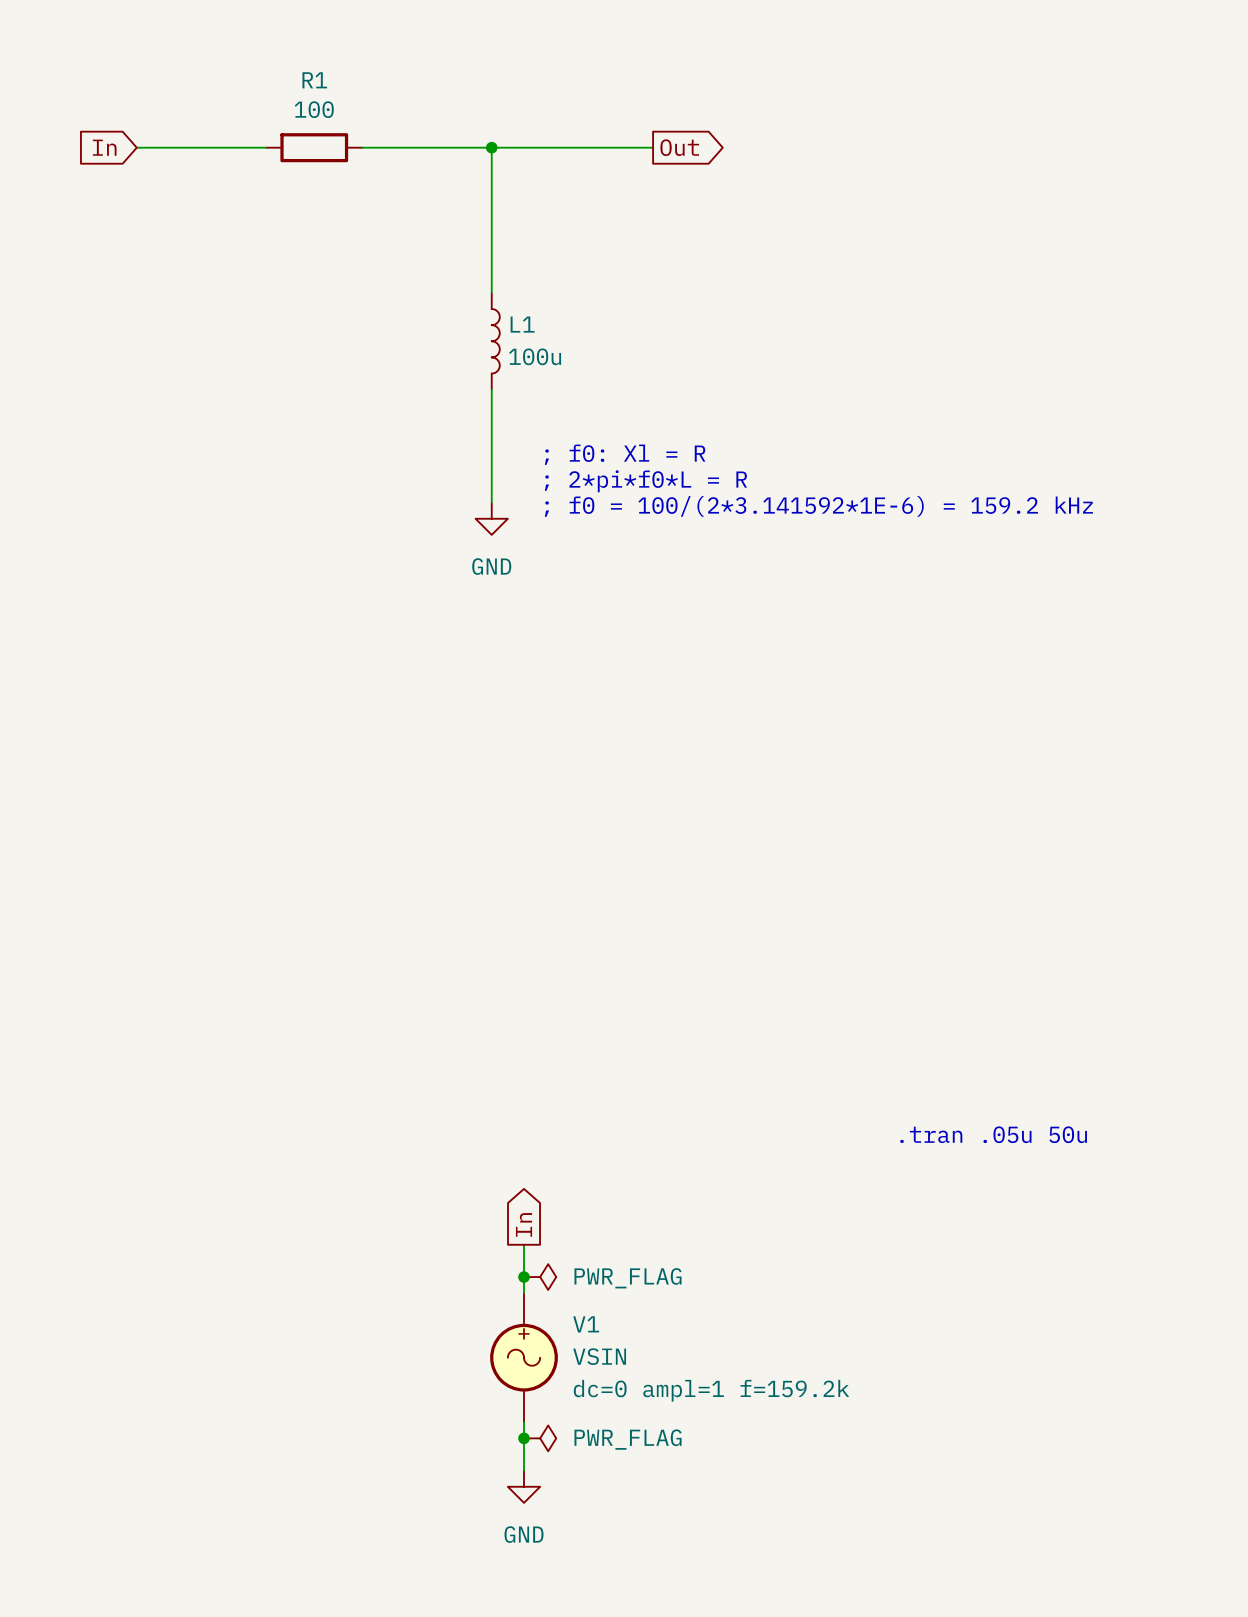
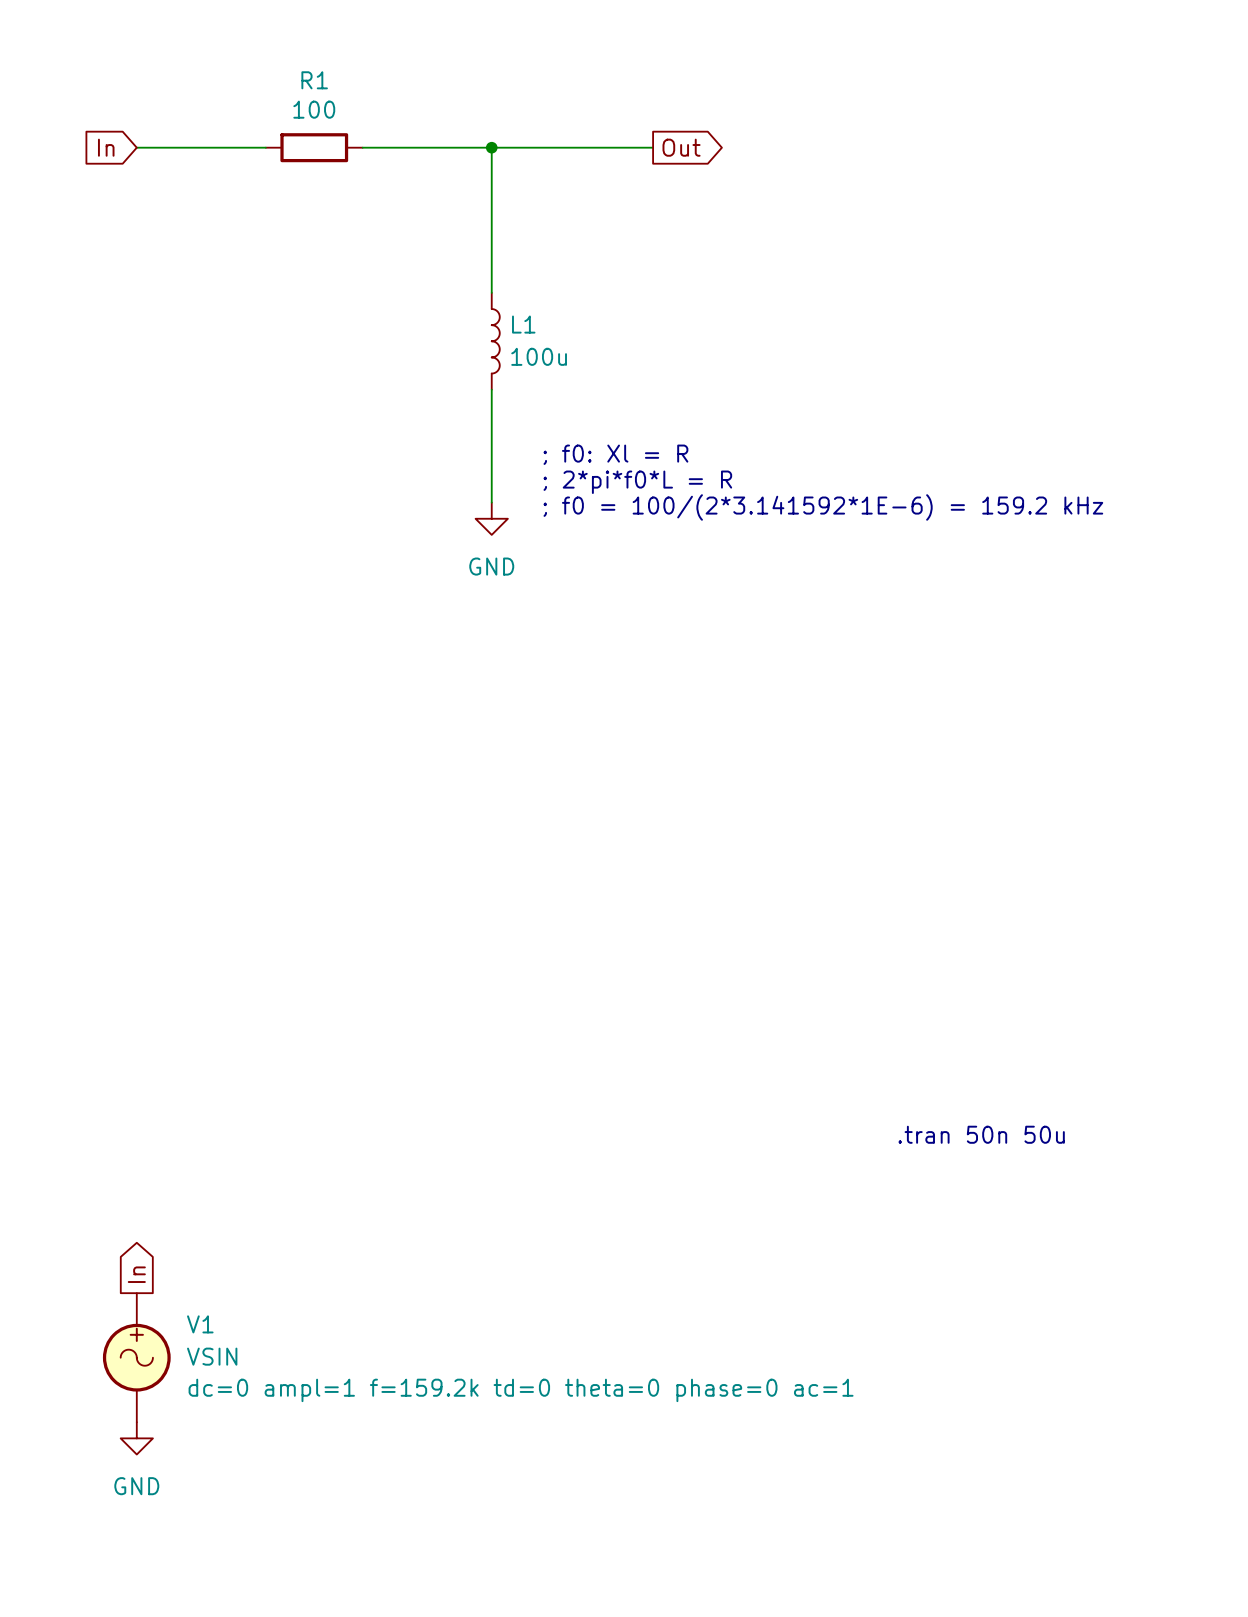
text: .tran .05u 50u (993, 1134) -> .tran 50n 50u (981, 1134)
global label: In (524, 1224) -> none
wire: (524, 1244) (524, 1293) -> none
global label: none -> In (136, 1274)
junction: (524, 1277) -> none
power symbol: PWR_FLAG (540, 1277) -> none
V1 position: (524, 1357) -> (136, 1357)
V1 text: dc=0 ampl=1 f=159.2k (711, 1390) -> dc=0 ampl=1 f=159.2k td=0 theta=0 phase=0 ac=1 (521, 1390)
wire: (524, 1422) (524, 1470) -> none
power symbol: none -> GND (136, 1438)
junction: (524, 1438) -> none
power symbol: PWR_FLAG (540, 1438) -> none
power symbol: GND (524, 1486) -> none

